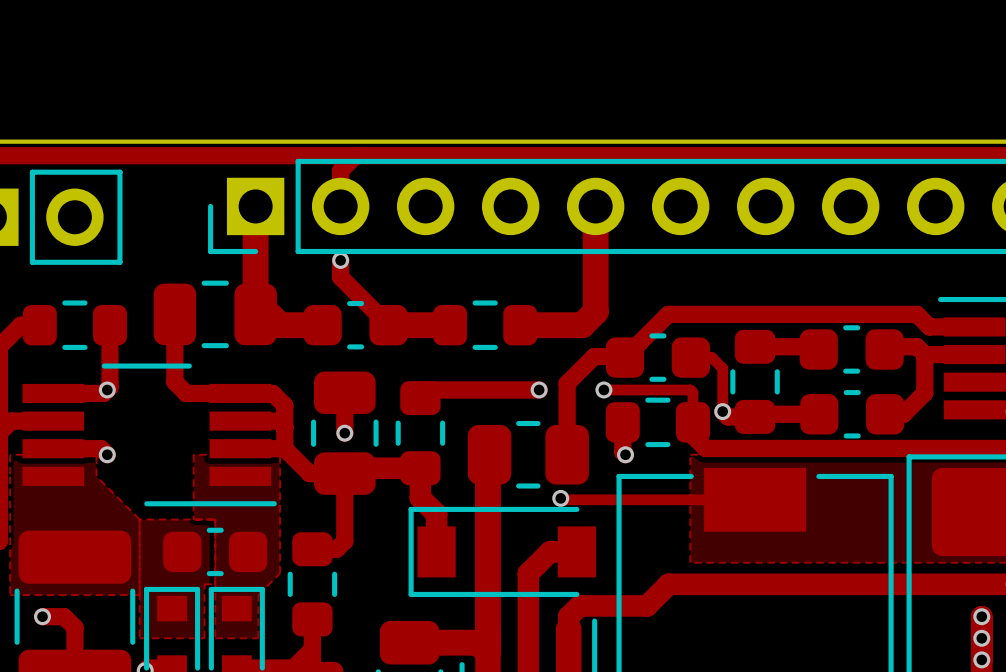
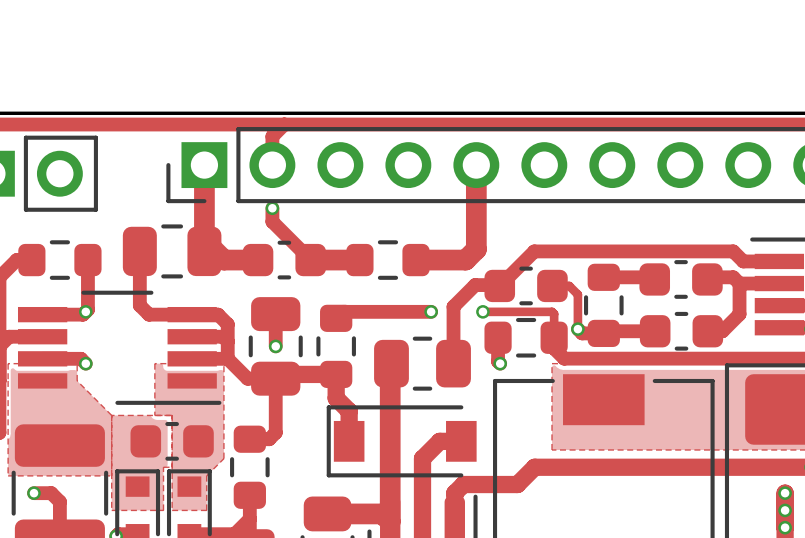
track: (560, 498) (755, 499) -> none
via: (560, 498) -> none

